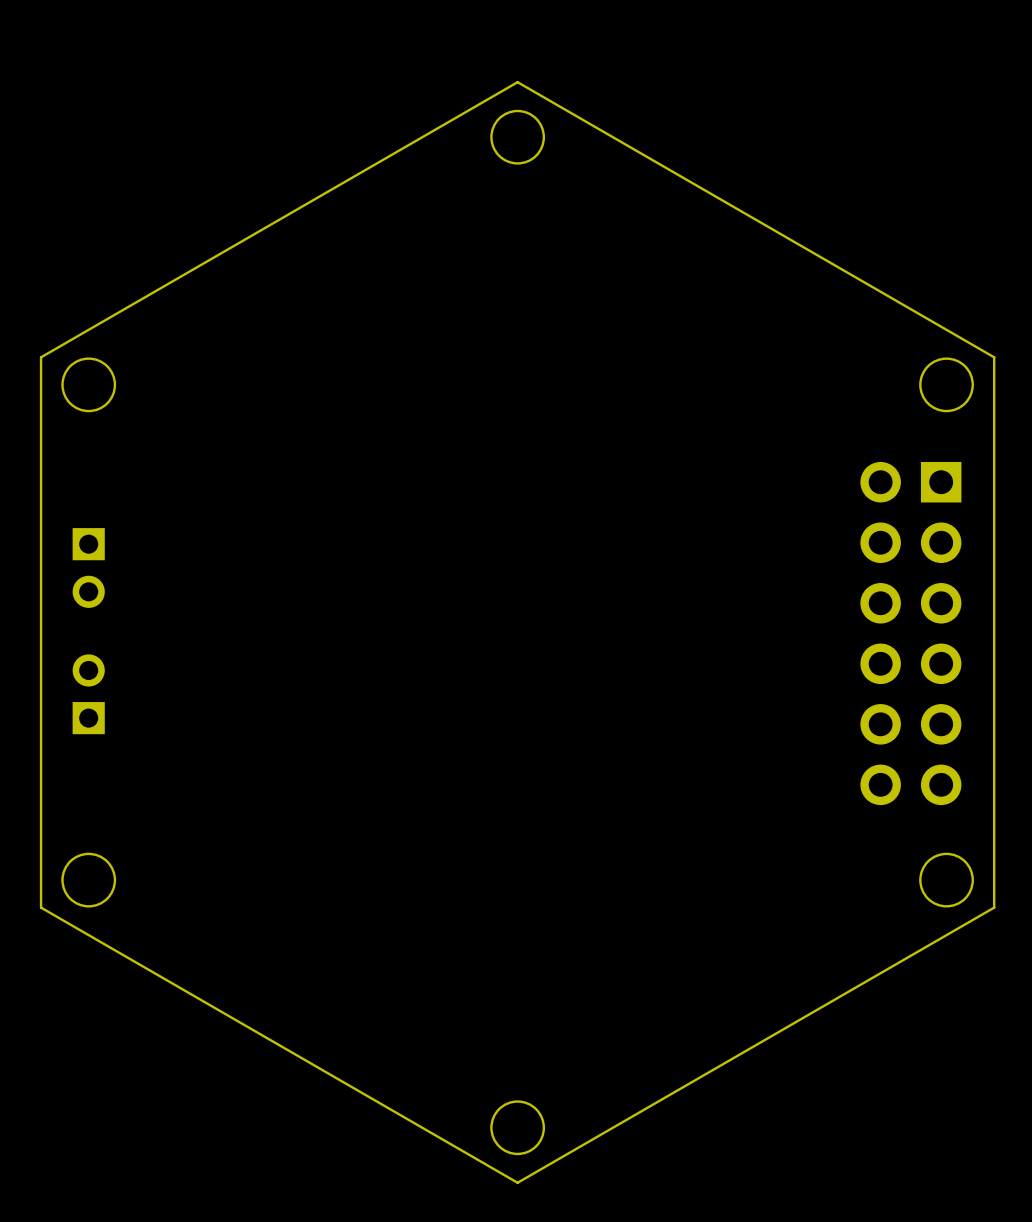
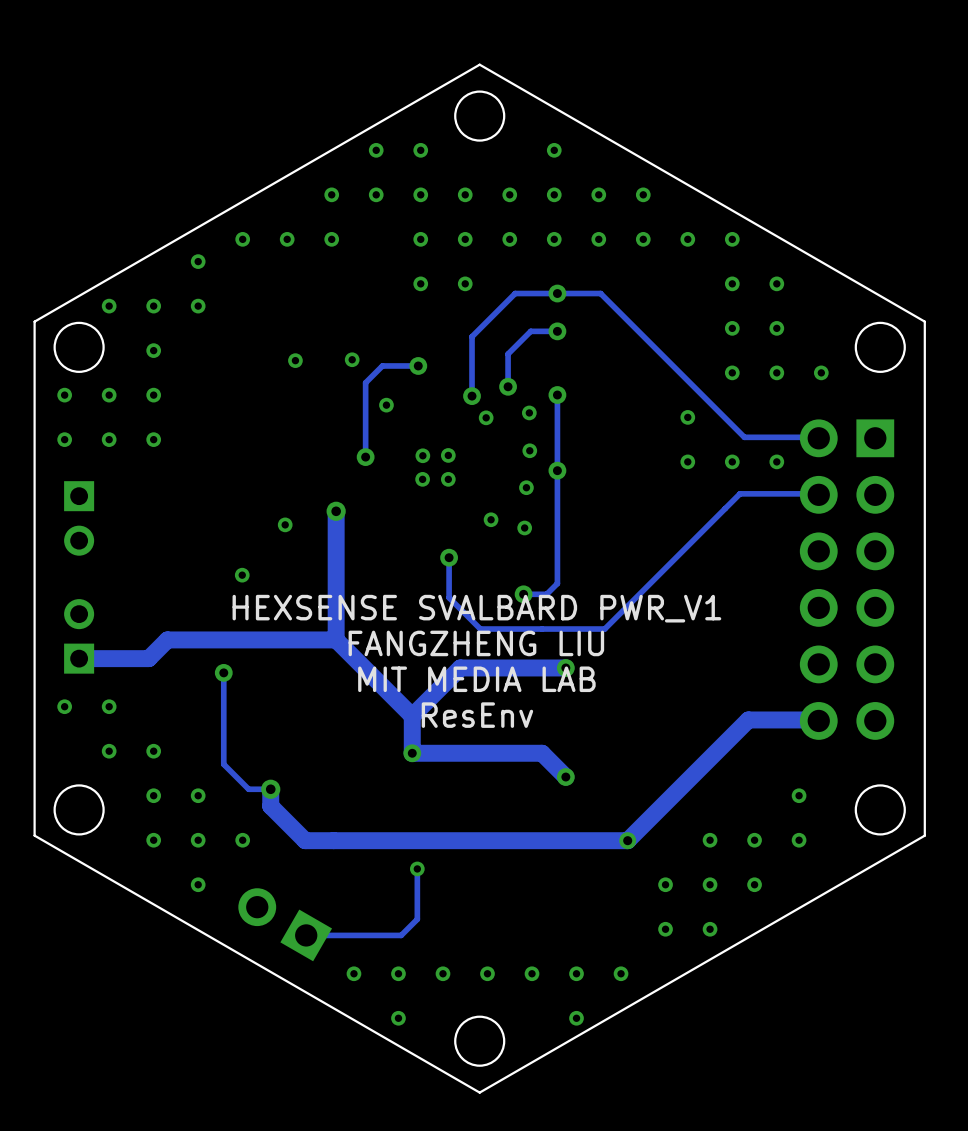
via: none -> (376, 150)
via: none -> (420, 150)
via: none -> (554, 150)
via: none -> (331, 194)
via: none -> (376, 194)
via: none -> (420, 194)
via: none -> (465, 194)
via: none -> (509, 194)
via: none -> (554, 194)
via: none -> (598, 194)
via: none -> (643, 194)
via: none -> (242, 239)
via: none -> (287, 239)
via: none -> (331, 239)
via: none -> (420, 239)
via: none -> (465, 239)
via: none -> (509, 239)
via: none -> (554, 239)
via: none -> (598, 239)
via: none -> (643, 239)
via: none -> (687, 239)
via: none -> (732, 239)
via: none -> (198, 261)
via: none -> (420, 283)
via: none -> (465, 283)
via: none -> (732, 283)
via: none -> (776, 283)
via: none -> (557, 293)
via: none -> (109, 306)
via: none -> (153, 306)
via: none -> (198, 306)
via: none -> (732, 328)
via: none -> (776, 328)
track: none -> (557, 331) (530, 331) (508, 354) (508, 386)
via: none -> (557, 331)
via: none -> (153, 350)
via: none -> (352, 359)
via: none -> (295, 360)
track: none -> (418, 365) (382, 365) (365, 382) (365, 457)
via: none -> (418, 365)
via: none -> (732, 372)
via: none -> (776, 372)
via: none -> (821, 372)
via: none -> (508, 386)
via: none -> (64, 395)
via: none -> (109, 395)
via: none -> (153, 395)
track: none -> (557, 395) (557, 583) (546, 594) (523, 594)
via: none -> (557, 395)
track: none -> (472, 396) (472, 336) (515, 293) (600, 293) (744, 437) (818, 437)
via: none -> (472, 396)
via: none -> (386, 405)
via: none -> (529, 412)
via: none -> (687, 417)
via: none -> (486, 417)
via: none -> (64, 439)
via: none -> (109, 439)
via: none -> (153, 439)
via: none -> (529, 450)
via: none -> (422, 455)
via: none -> (448, 455)
via: none -> (365, 457)
via: none -> (687, 461)
via: none -> (732, 461)
via: none -> (776, 461)
via: none -> (557, 470)
via: none -> (422, 479)
via: none -> (448, 479)
via: none -> (526, 487)
track: none -> (818, 493) (739, 493) (604, 629) (480, 629) (449, 597) (449, 557)
track: none -> (336, 511) (336, 639)
via: none -> (336, 511)
via: none -> (491, 519)
via: none -> (285, 524)
via: none -> (524, 527)
via: none -> (449, 557)
via: none -> (242, 575)
via: none -> (523, 594)
text: none -> HEXSENSE SVALBARD PWR_V1 (476, 608)
track: none -> (336, 639) (412, 716)
track: none -> (336, 639) (167, 639) (148, 658) (79, 658)
text: none -> FANGZHENG LIU (476, 643)
track: none -> (565, 667) (460, 667) (412, 716)
via: none -> (565, 667)
track: none -> (223, 672) (223, 764) (248, 789) (270, 789) (270, 806) (305, 840) (627, 840) (748, 719) (818, 719)
via: none -> (223, 672)
text: none -> MIT MEDIA LAB (476, 679)
via: none -> (64, 706)
via: none -> (109, 706)
text: none -> ResEnv (477, 715)
track: none -> (412, 716) (412, 753) (542, 753) (565, 777)
via: none -> (109, 751)
via: none -> (153, 751)
via: none -> (412, 753)
via: none -> (565, 777)
via: none -> (270, 789)
via: none -> (153, 795)
via: none -> (198, 795)
via: none -> (799, 795)
via: none -> (153, 840)
via: none -> (198, 840)
via: none -> (242, 840)
via: none -> (710, 840)
via: none -> (754, 840)
via: none -> (799, 840)
via: none -> (627, 840)
track: none -> (417, 868) (417, 919) (401, 935) (306, 935)
via: none -> (417, 868)
via: none -> (198, 884)
via: none -> (665, 884)
via: none -> (710, 884)
via: none -> (754, 884)
part: none -> (285, 924)
via: none -> (665, 929)
via: none -> (710, 929)
via: none -> (353, 973)
via: none -> (398, 973)
via: none -> (442, 973)
via: none -> (487, 973)
via: none -> (532, 973)
via: none -> (576, 973)
via: none -> (621, 973)
via: none -> (398, 1018)
via: none -> (576, 1018)

